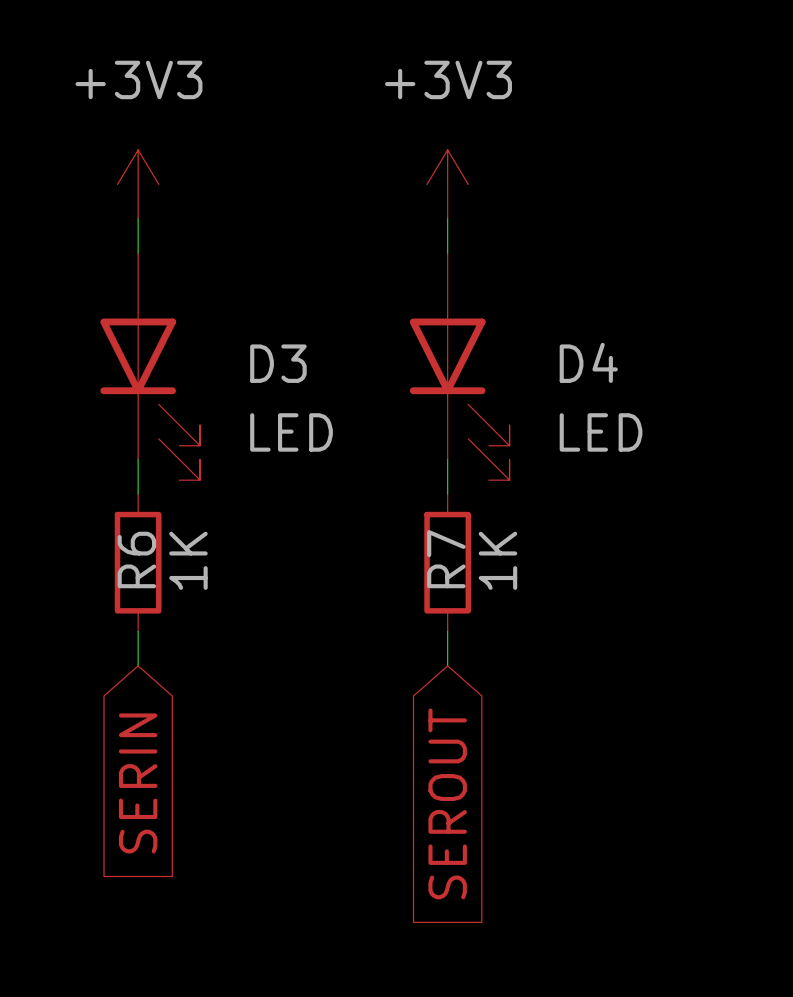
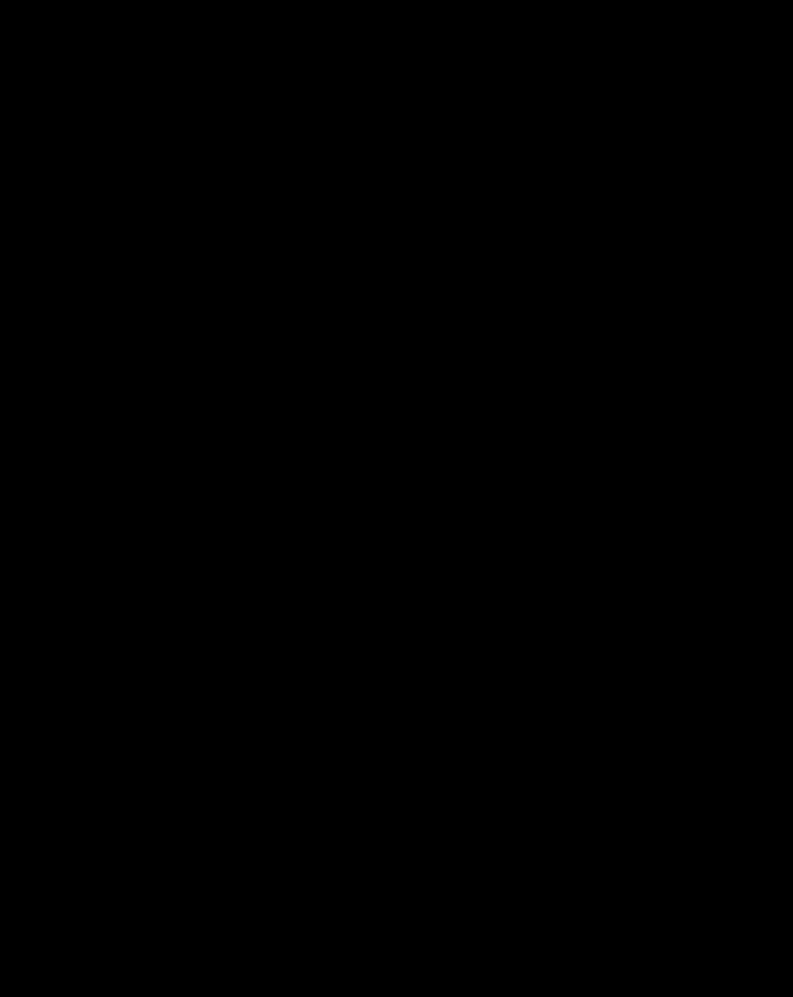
power symbol: +3V3 (138, 184) -> none
power symbol: +3V3 (447, 184) -> none
wire: (138, 218) (138, 253) -> none
wire: (447, 218) (447, 253) -> none
D3: LED (150, 366) -> none
D4: LED (459, 366) -> none
wire: (138, 459) (138, 493) -> none
wire: (447, 459) (447, 493) -> none
R6: 1K (138, 562) -> none
R7: 1K (447, 562) -> none
wire: (138, 631) (138, 665) -> none
wire: (447, 631) (447, 665) -> none
global label: SERIN (138, 783) -> none
global label: SEROUT (447, 803) -> none

